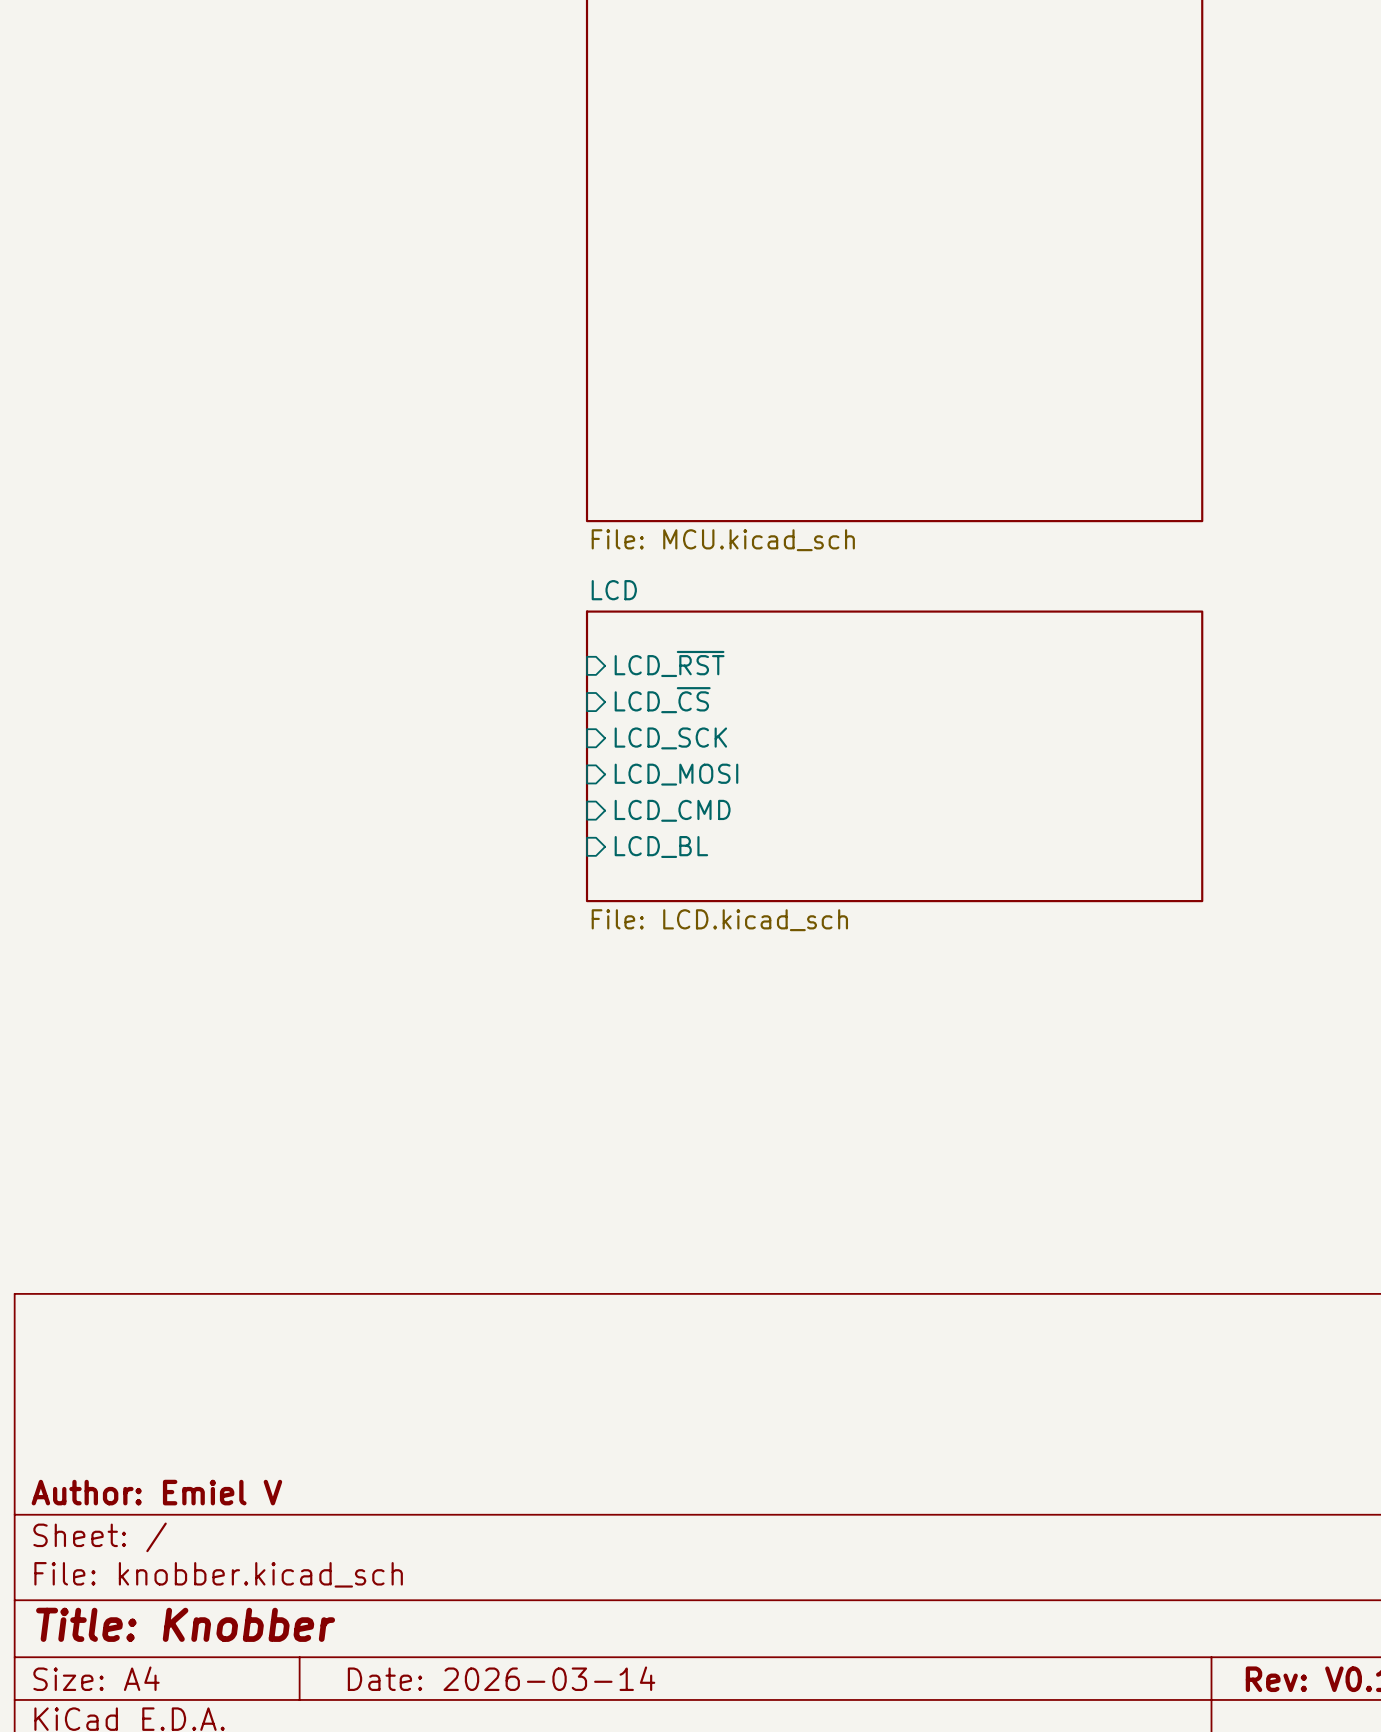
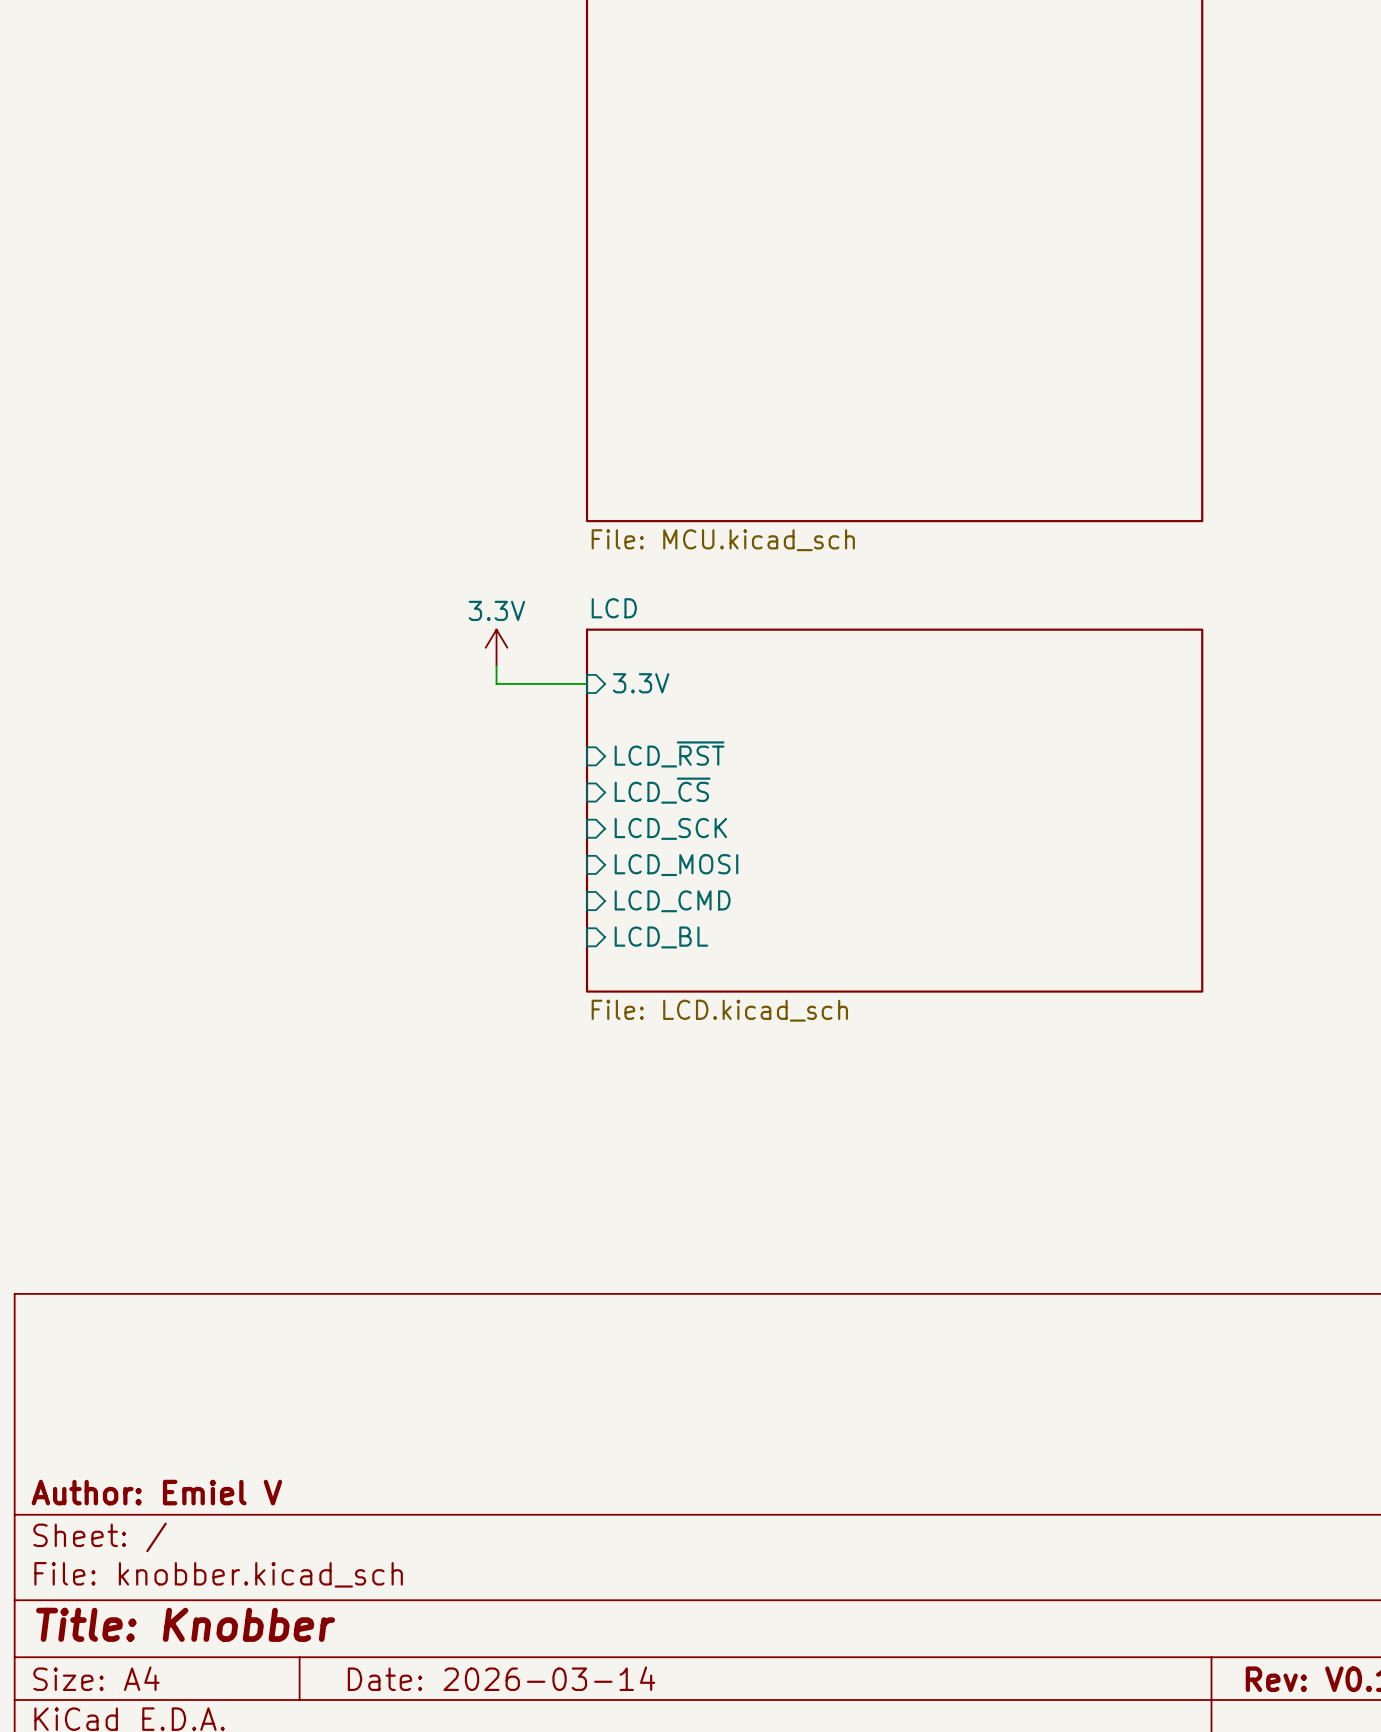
power symbol: none -> 3.3V (496, 647)
sheet pin position: LCD_~{RST} (669, 663) -> LCD_~{RST} (669, 754)
wire: none -> (496, 665) (496, 683) (587, 683)
sheet pin: none -> 3.3V (641, 683)
sheet pin position: LCD_~{CS} (662, 700) -> LCD_~{CS} (662, 790)
sheet pin position: LCD_SCK (670, 738) -> LCD_SCK (670, 828)
sheet LCD: File: LCD.kicad_sch (894, 756) -> none
sheet pin position: LCD_MOSI (676, 774) -> LCD_MOSI (676, 865)
sheet pin position: LCD_CMD (672, 810) -> LCD_CMD (672, 901)
sheet LCD: none -> File: LCD.kicad_sch (894, 810)
sheet pin position: LCD_BL (661, 846) -> LCD_BL (661, 937)

